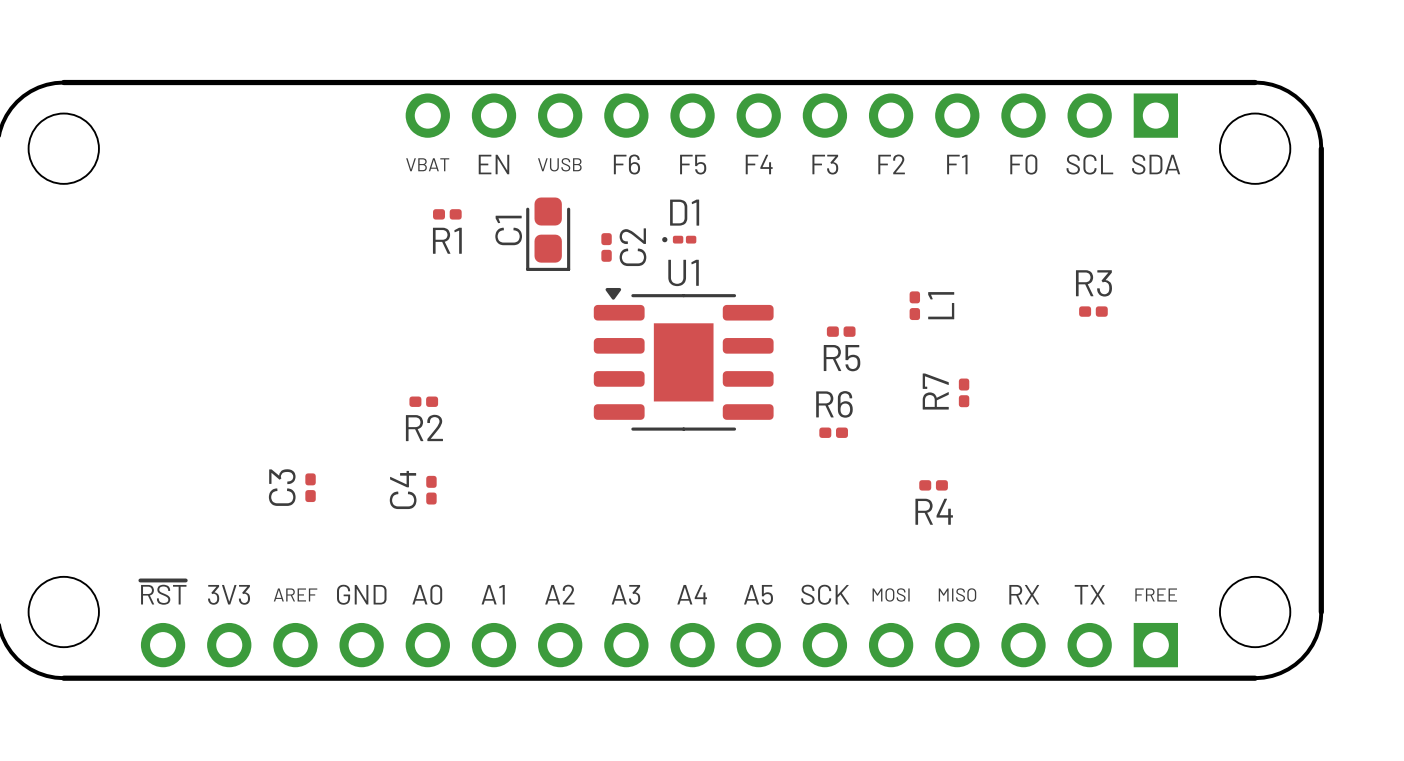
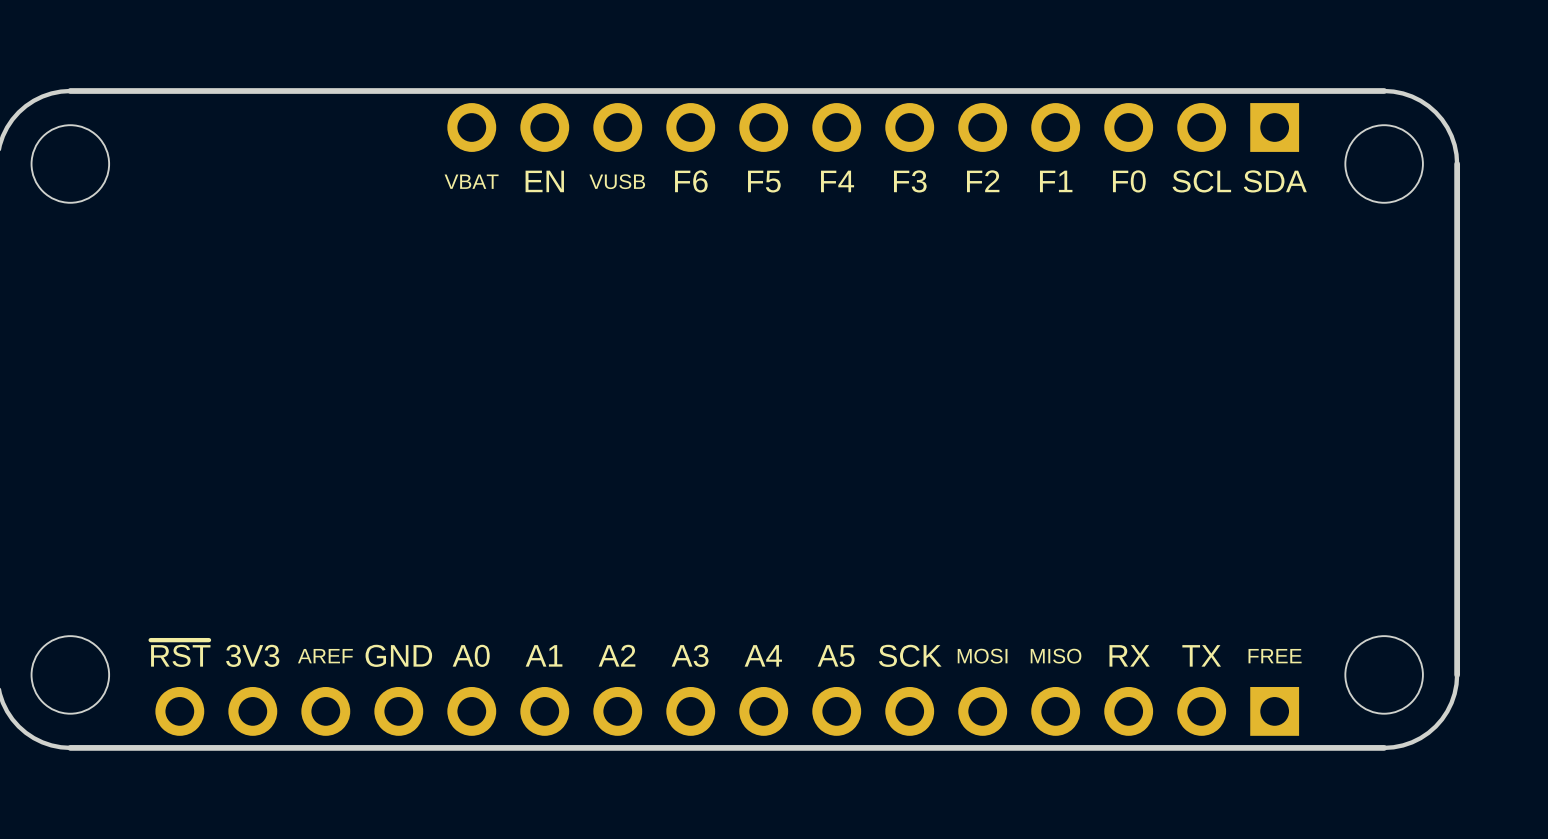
R1: (447, 214) -> none
C1: (548, 234) -> none
D1: (679, 239) -> none
C2: (606, 247) -> none
L1: (914, 305) -> none
R3: (1093, 311) -> none
R5: (841, 331) -> none
U1: (683, 359) -> none
R7: (964, 392) -> none
R2: (423, 401) -> none
R6: (833, 432) -> none
R4: (933, 485) -> none
C3: (310, 487) -> none
C4: (431, 490) -> none

